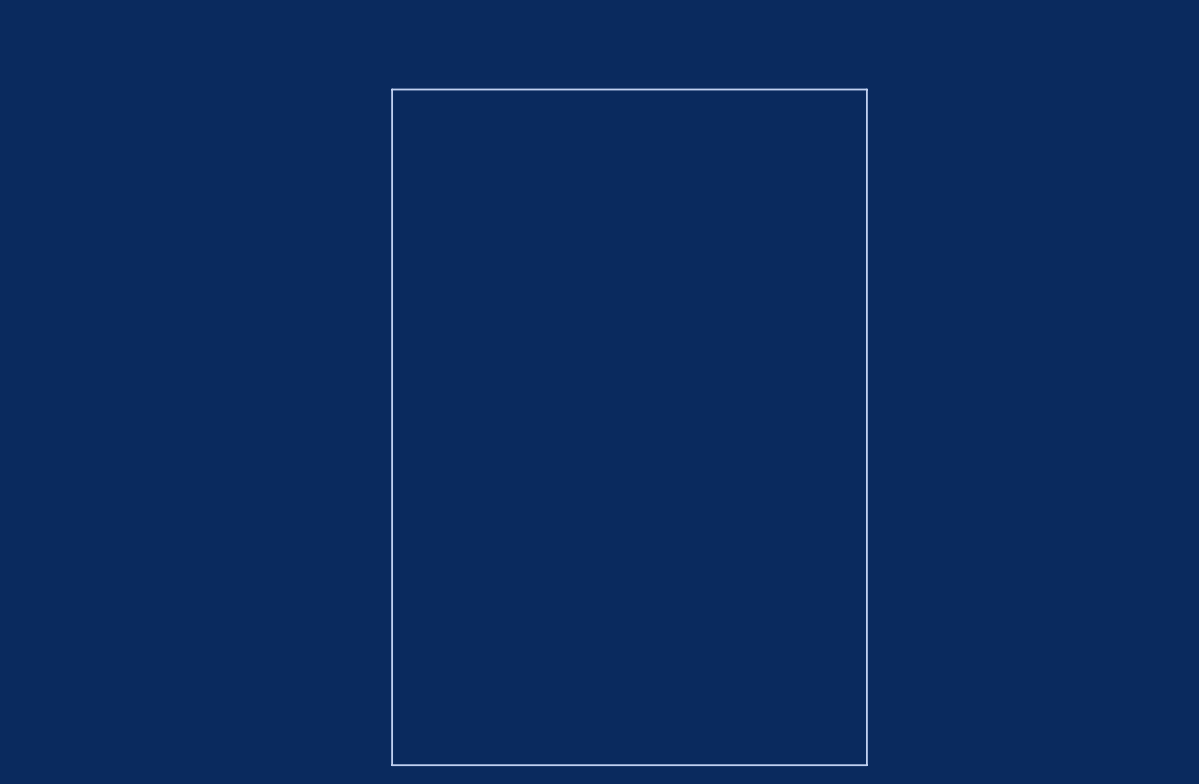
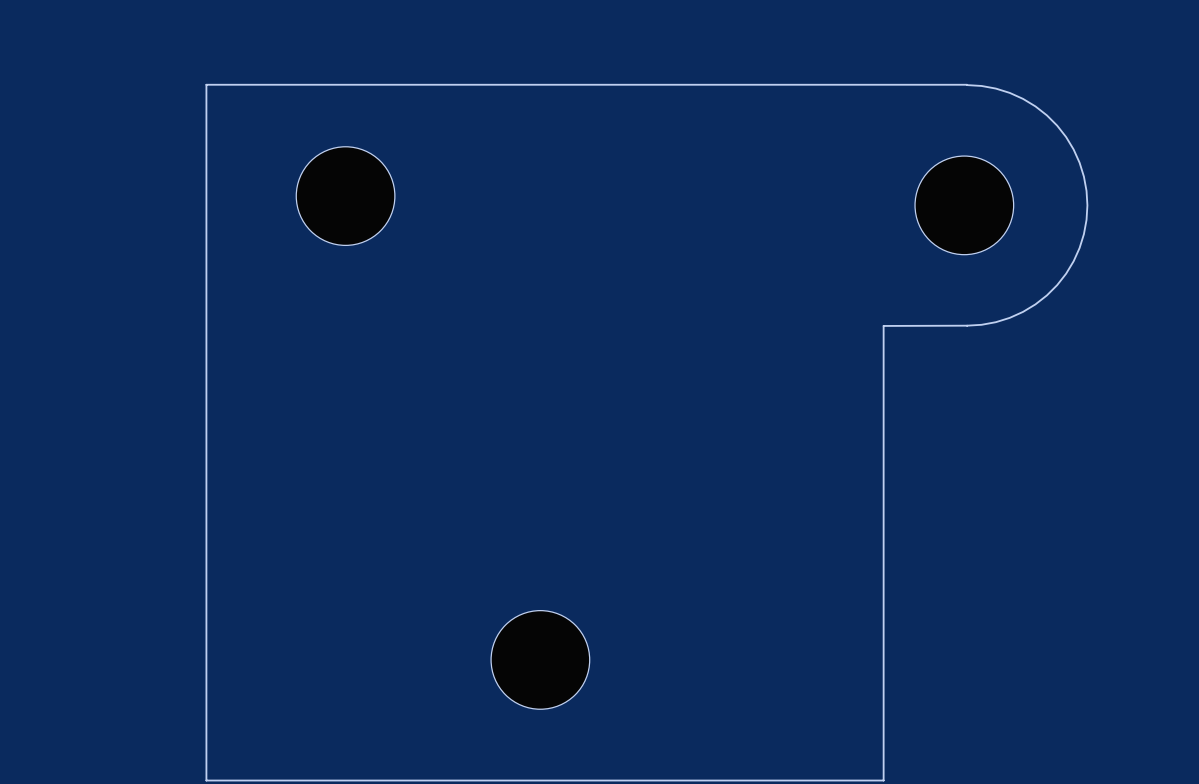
board edge: (866, 89) (392, 89) (392, 765) (866, 765) (866, 89) -> (967, 84) (206, 84) (206, 780) (883, 780) (883, 325) (981, 324) (1009, 317) (1023, 311) (1046, 295) (1066, 273) (1079, 248) (1086, 219) (1086, 190) (1079, 162) (1073, 149) (1057, 125) (1035, 106) (1009, 92) (981, 85) (967, 85)
part: none -> (345, 196)
part: none -> (964, 205)
part: none -> (540, 659)

